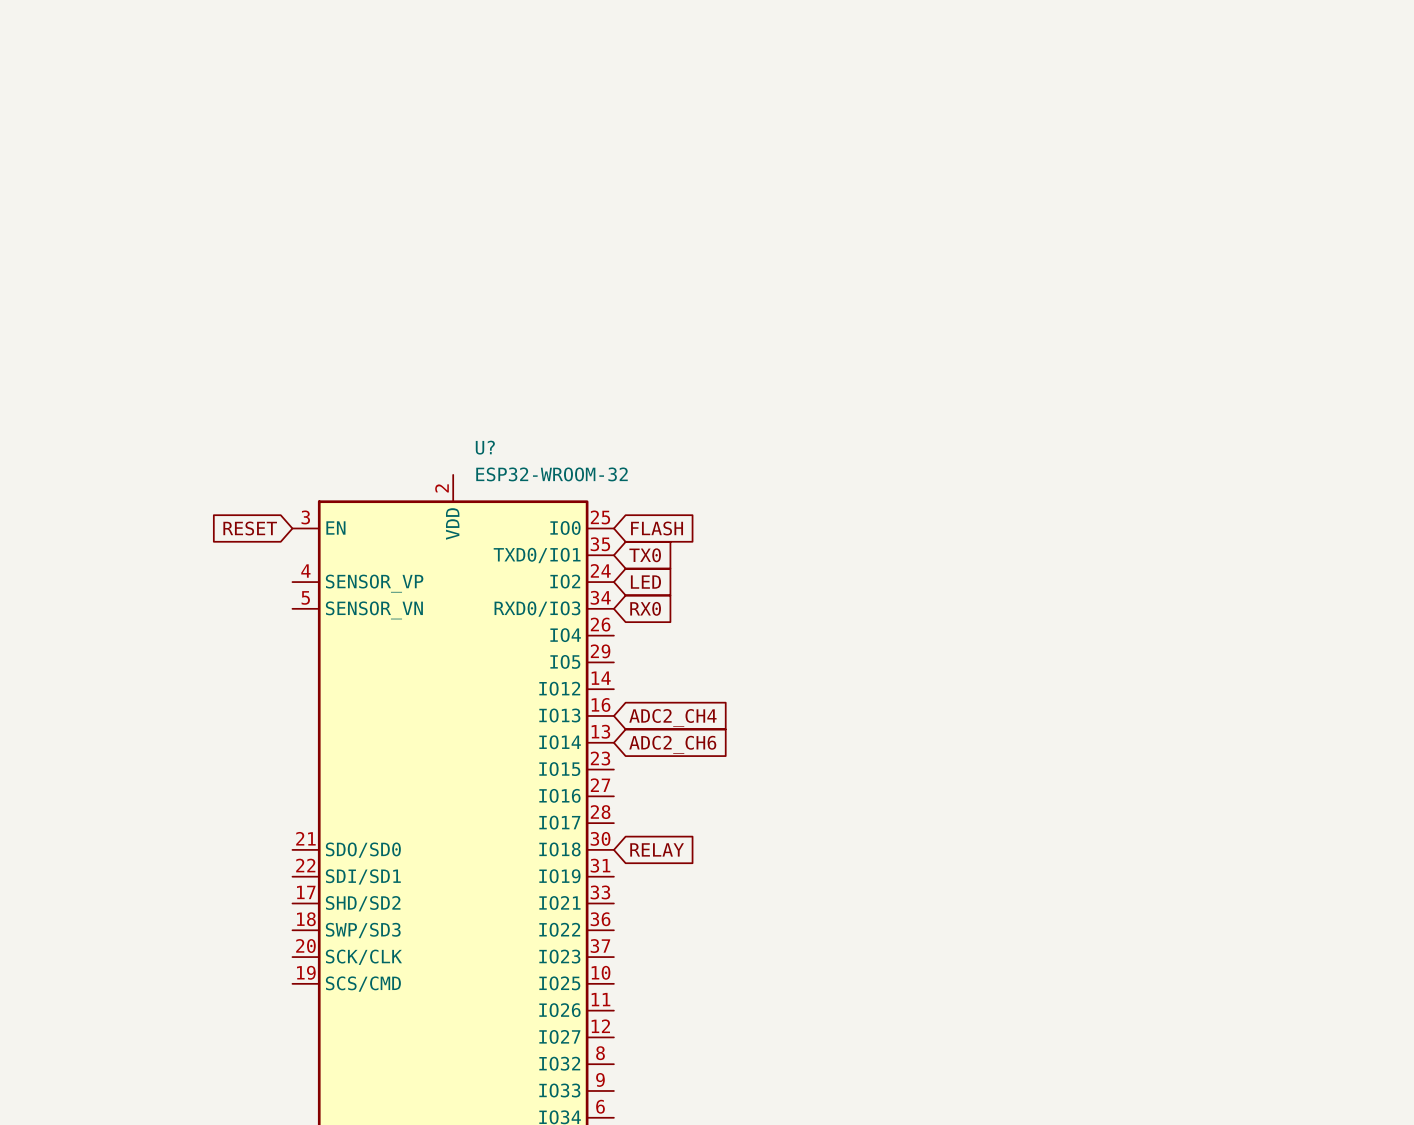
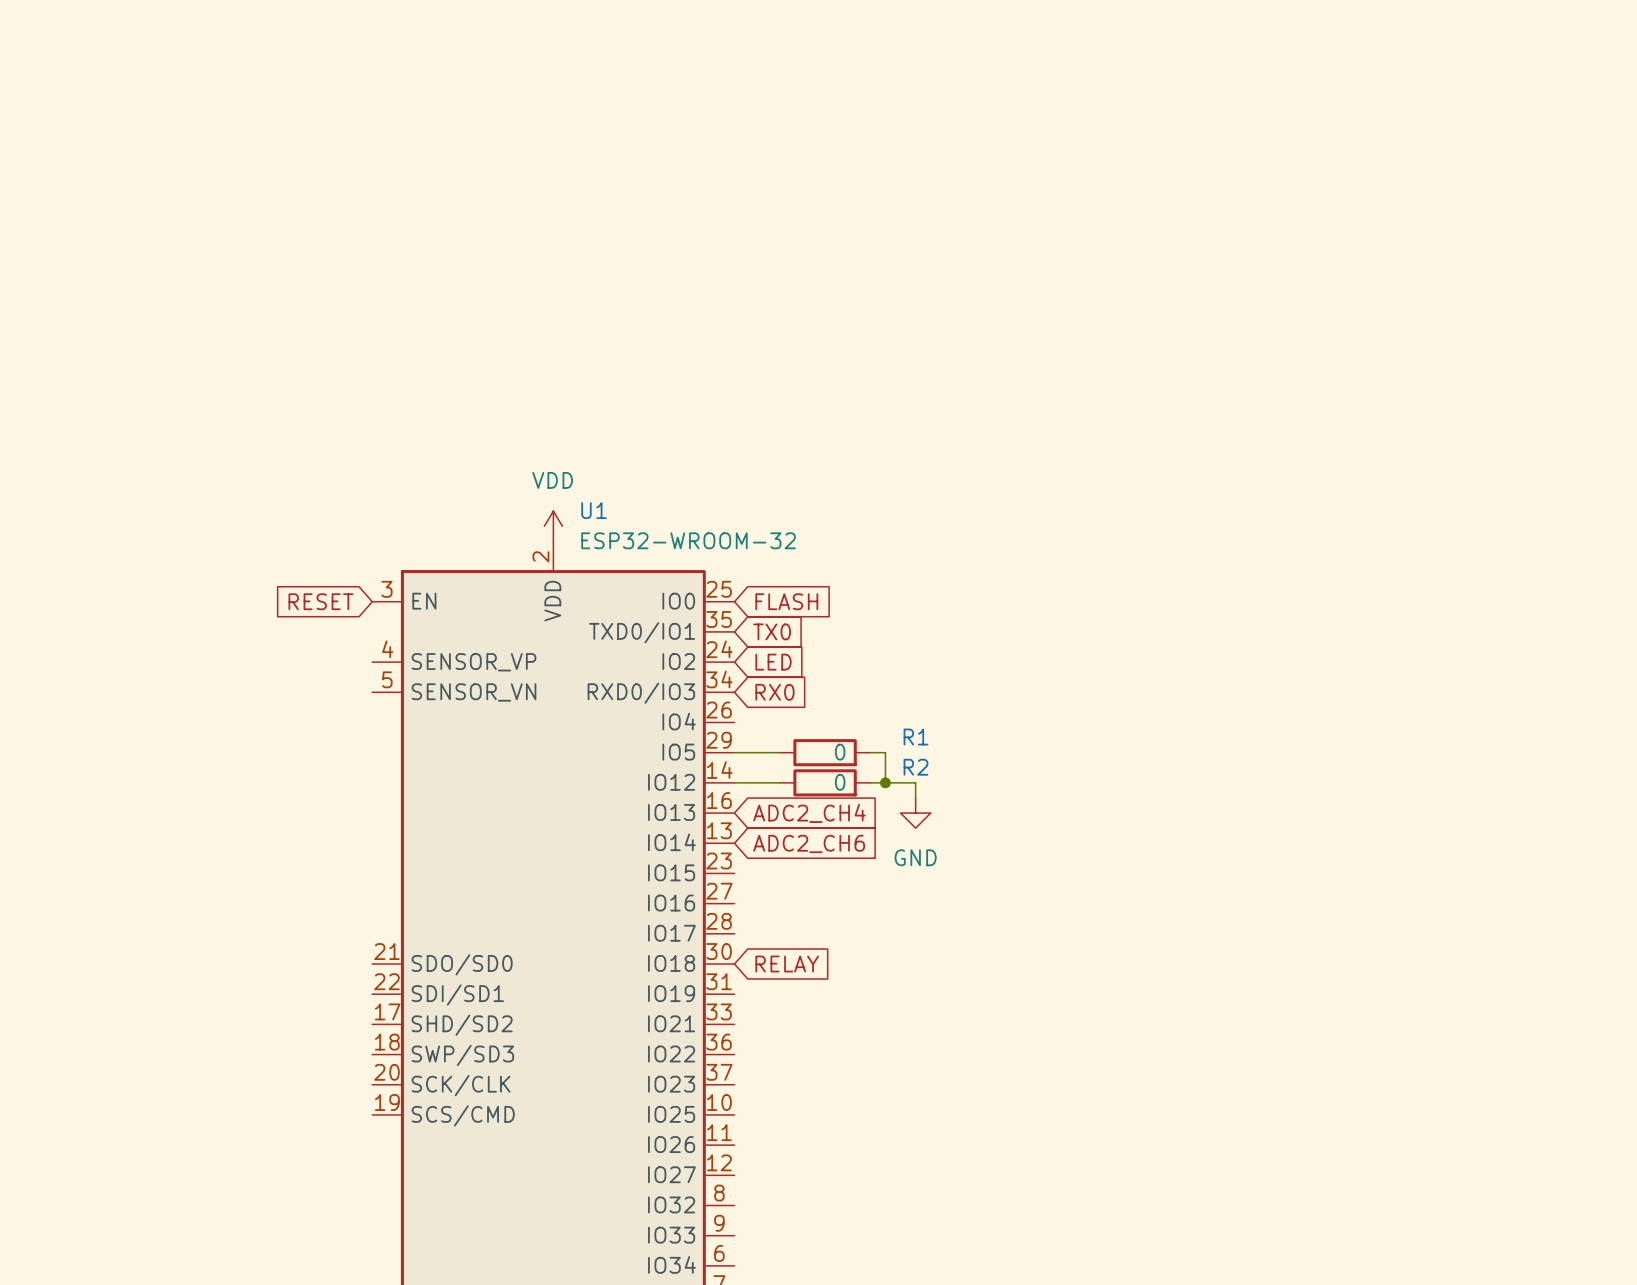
U? name: U? (485, 447) -> U1 (594, 510)
power symbol: none -> VDD (553, 526)
wire: none -> (734, 752) (779, 752)
R1: none -> 0 (825, 752)
wire: none -> (870, 752) (885, 752) (885, 782)
wire: none -> (734, 782) (779, 782)
R2: none -> 0 (825, 782)
wire: none -> (870, 782) (915, 782) (915, 797)
junction: none -> (885, 782)
power symbol: none -> GND (915, 813)

